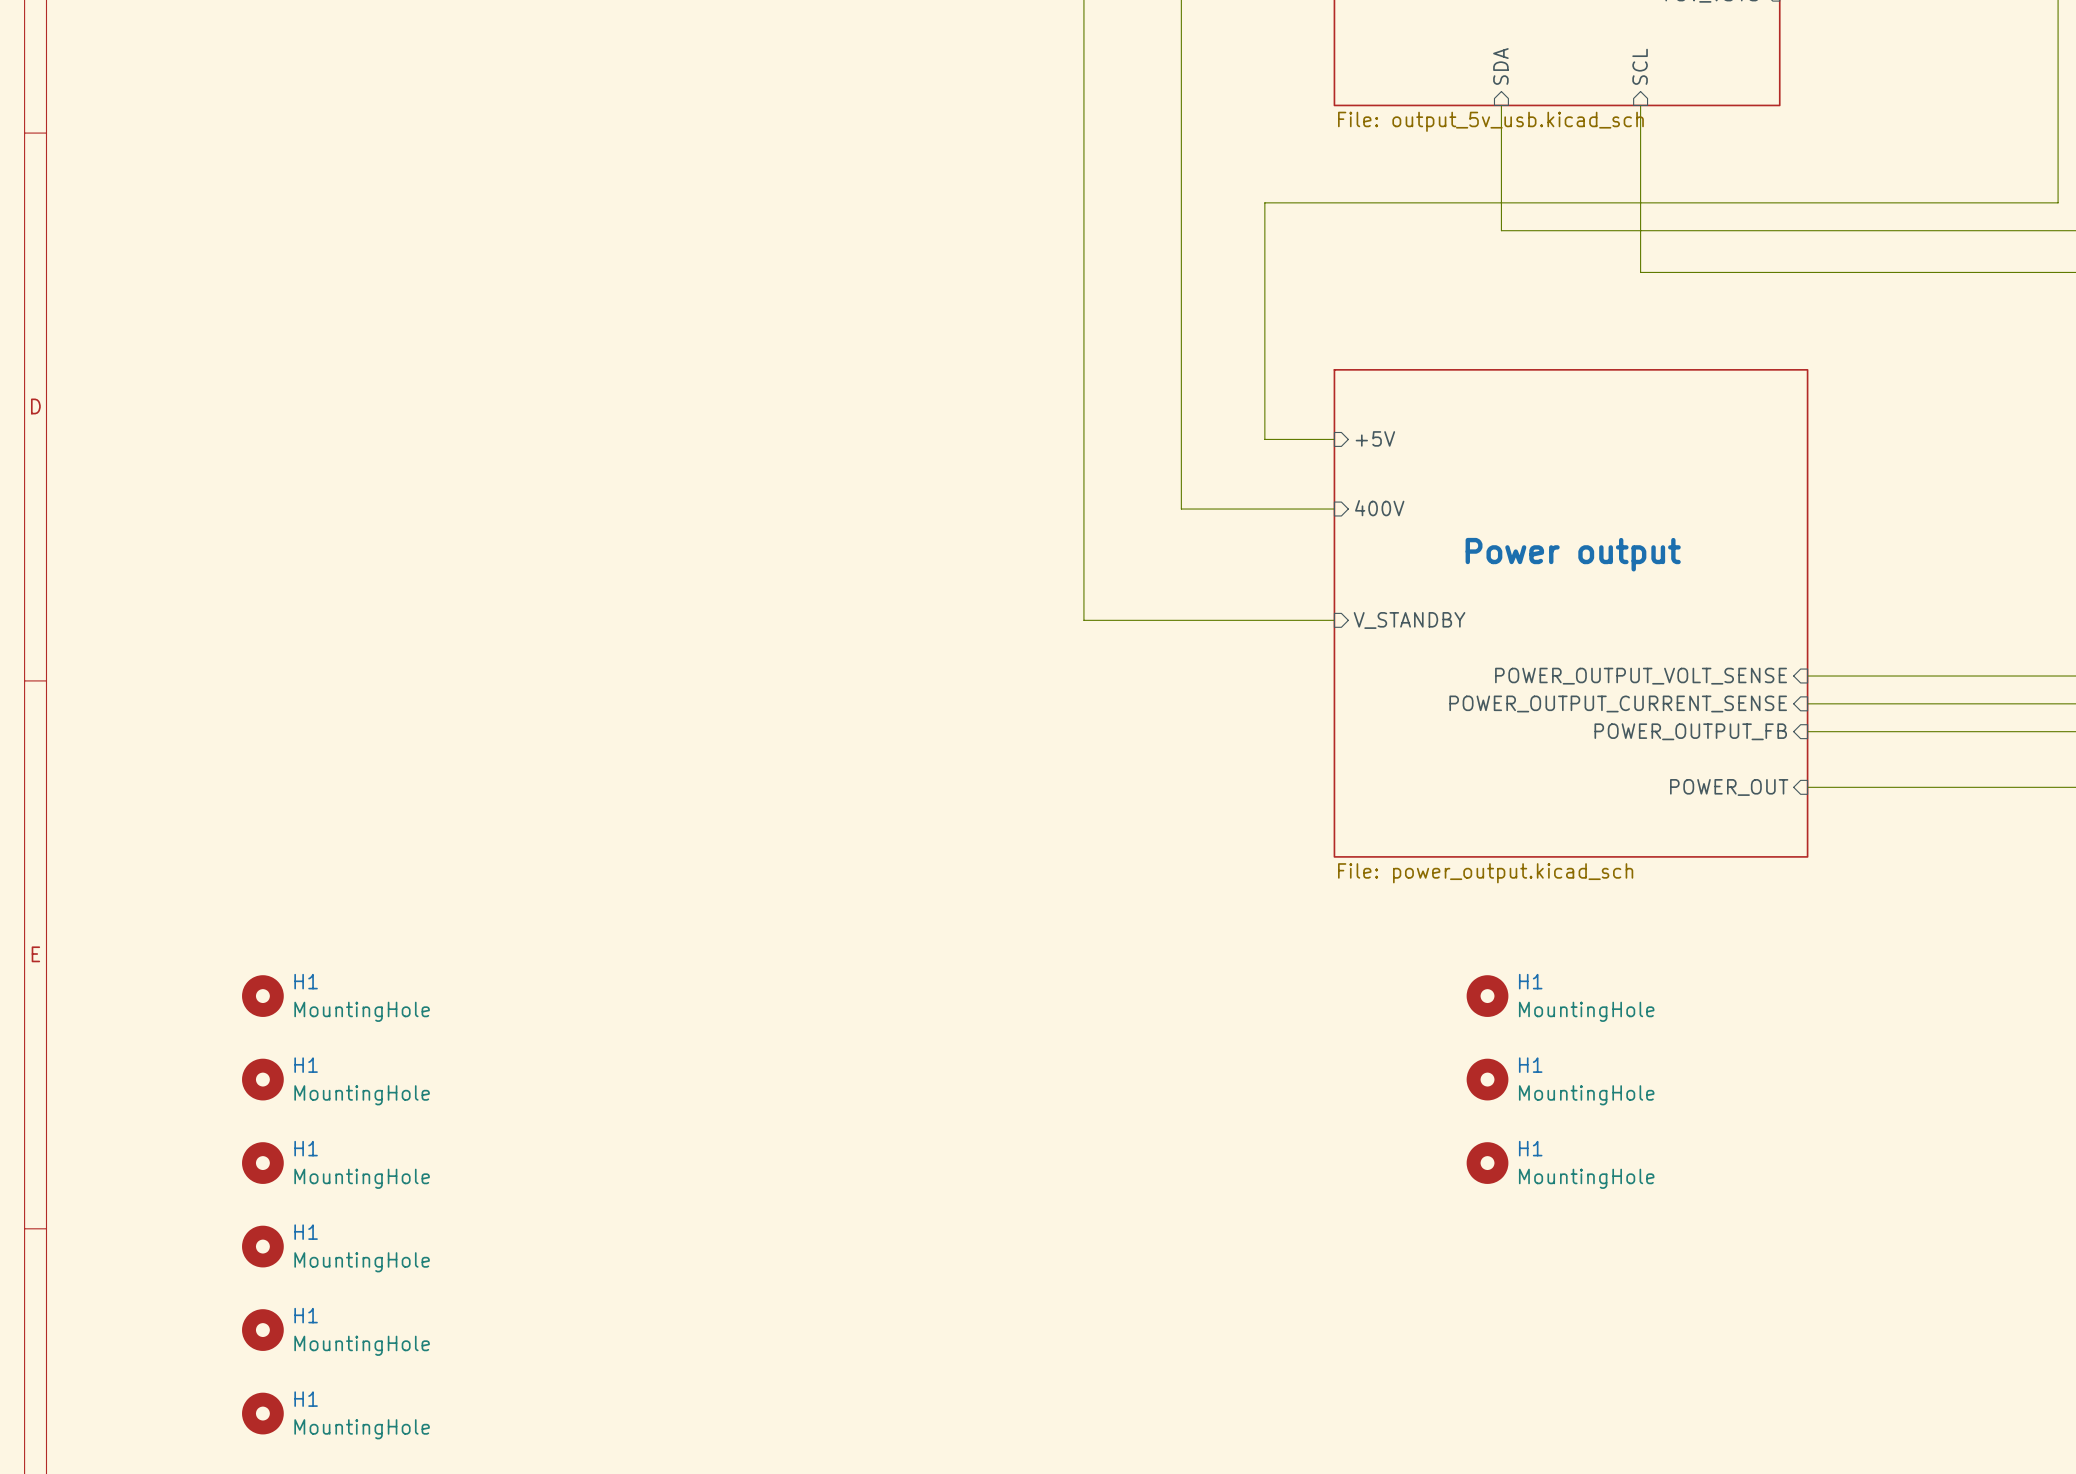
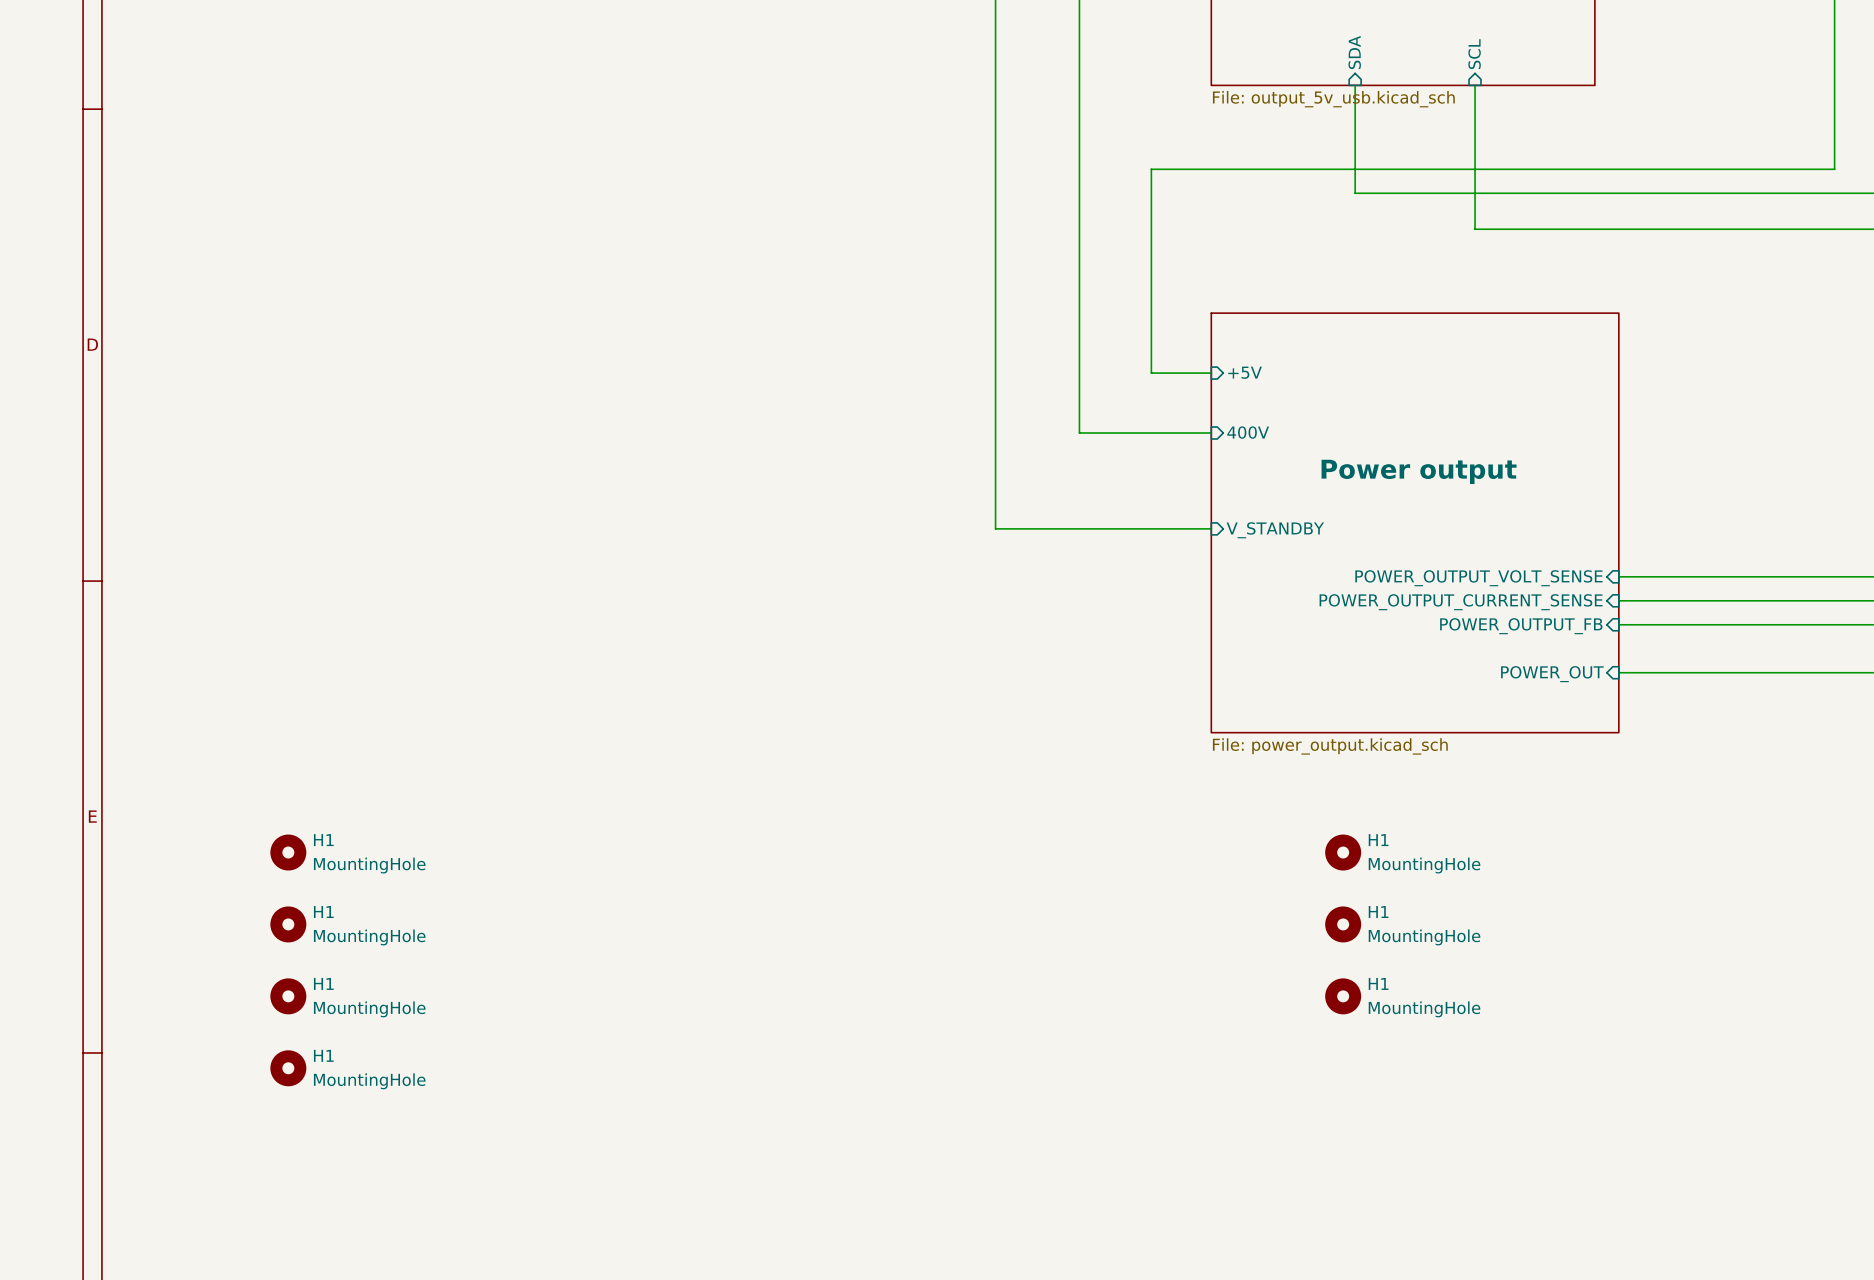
H1: MountingHole (262, 1330) -> none
H1: MountingHole (262, 1413) -> none

